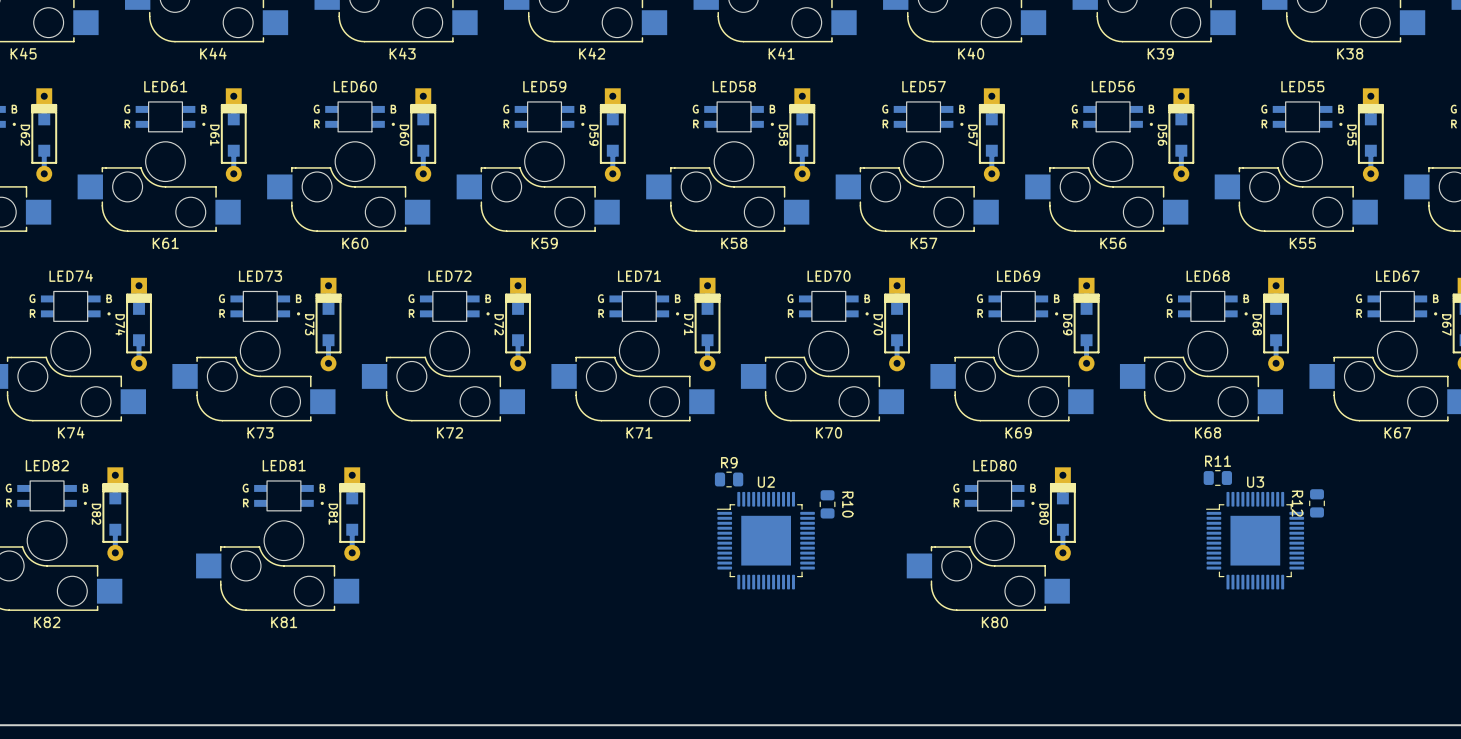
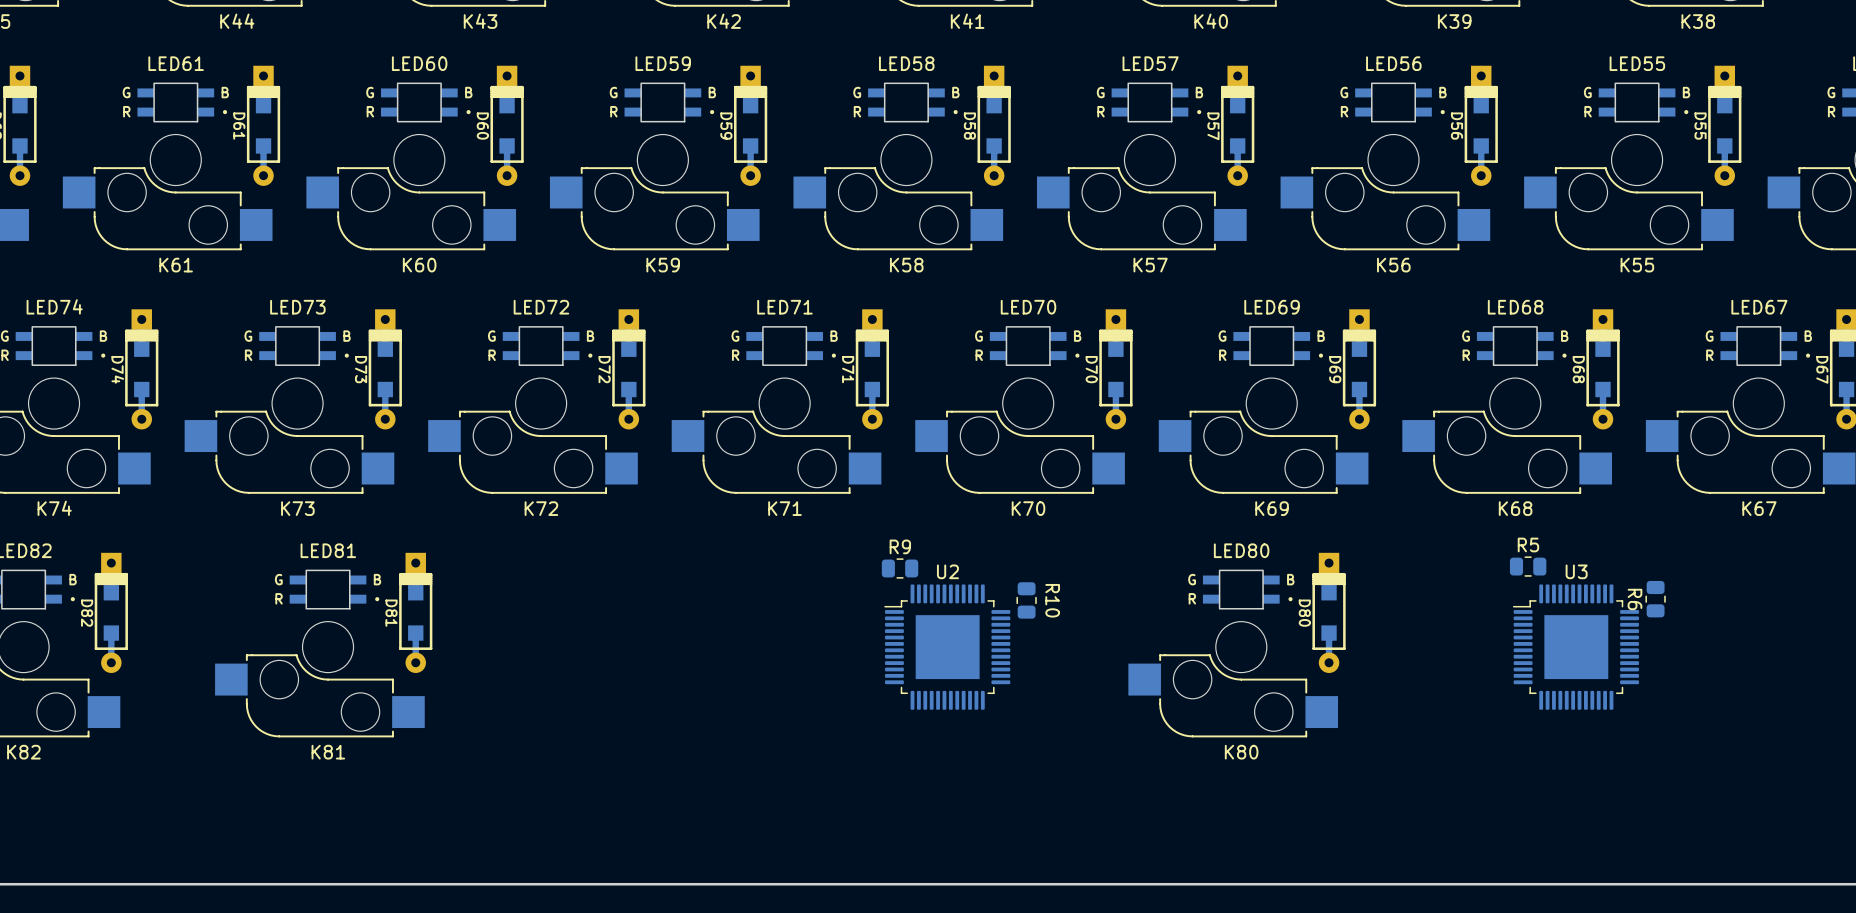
R11 name: R11 (1218, 461) -> R5 (1528, 544)
R12 name: R12 (1297, 503) -> R6 (1634, 599)

